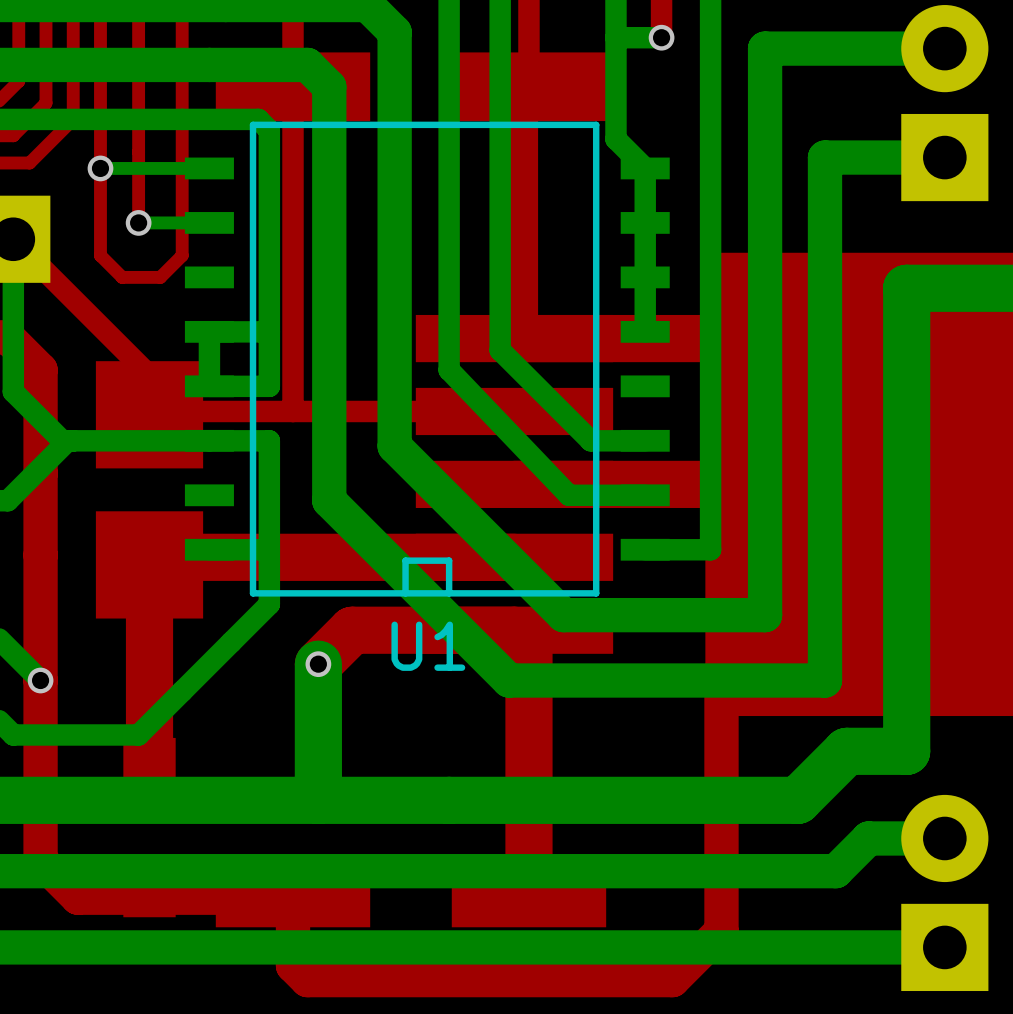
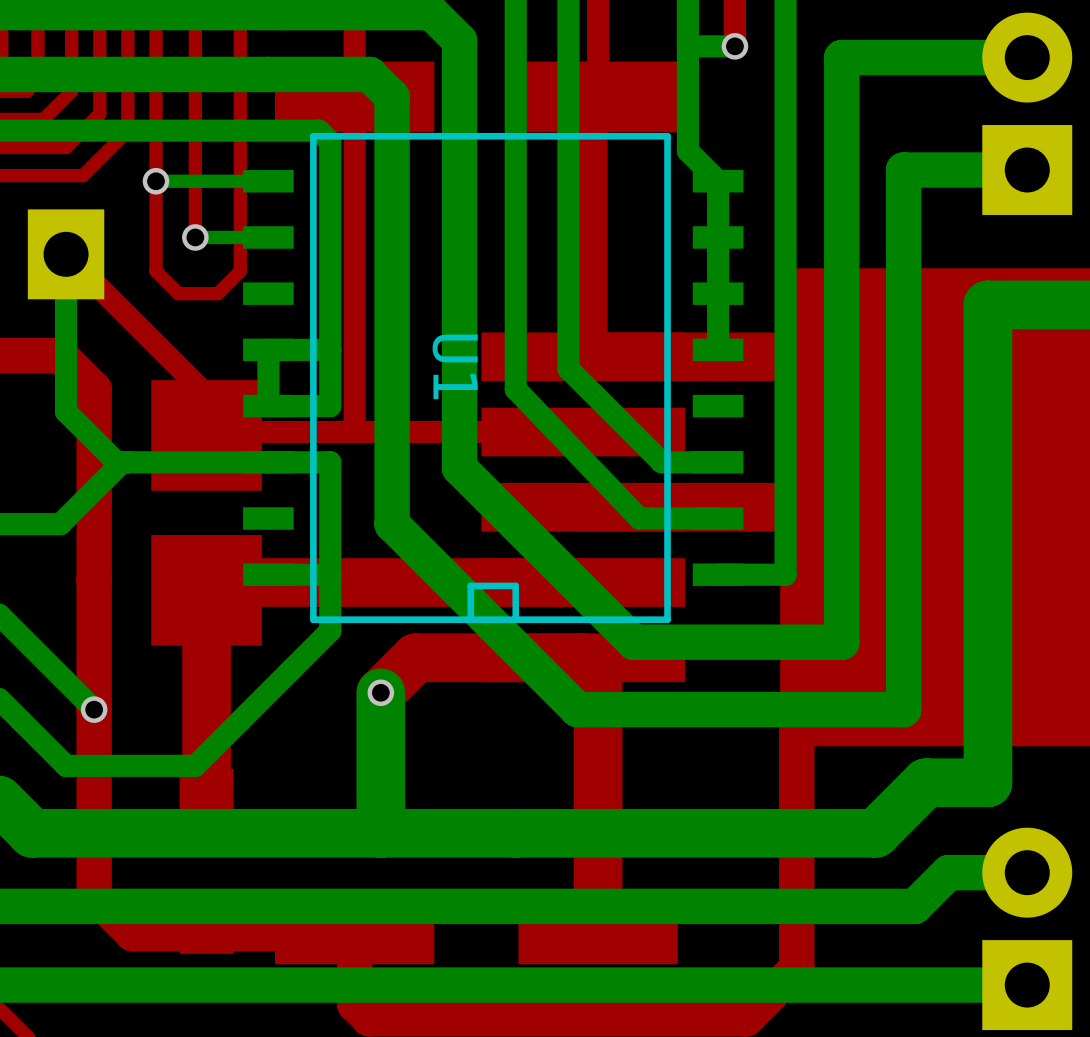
U1 name rotation: 0° (428, 646) -> 90° clockwise (455, 366)
U1 name position: U1 (428, 646) -> U1 (455, 366)

